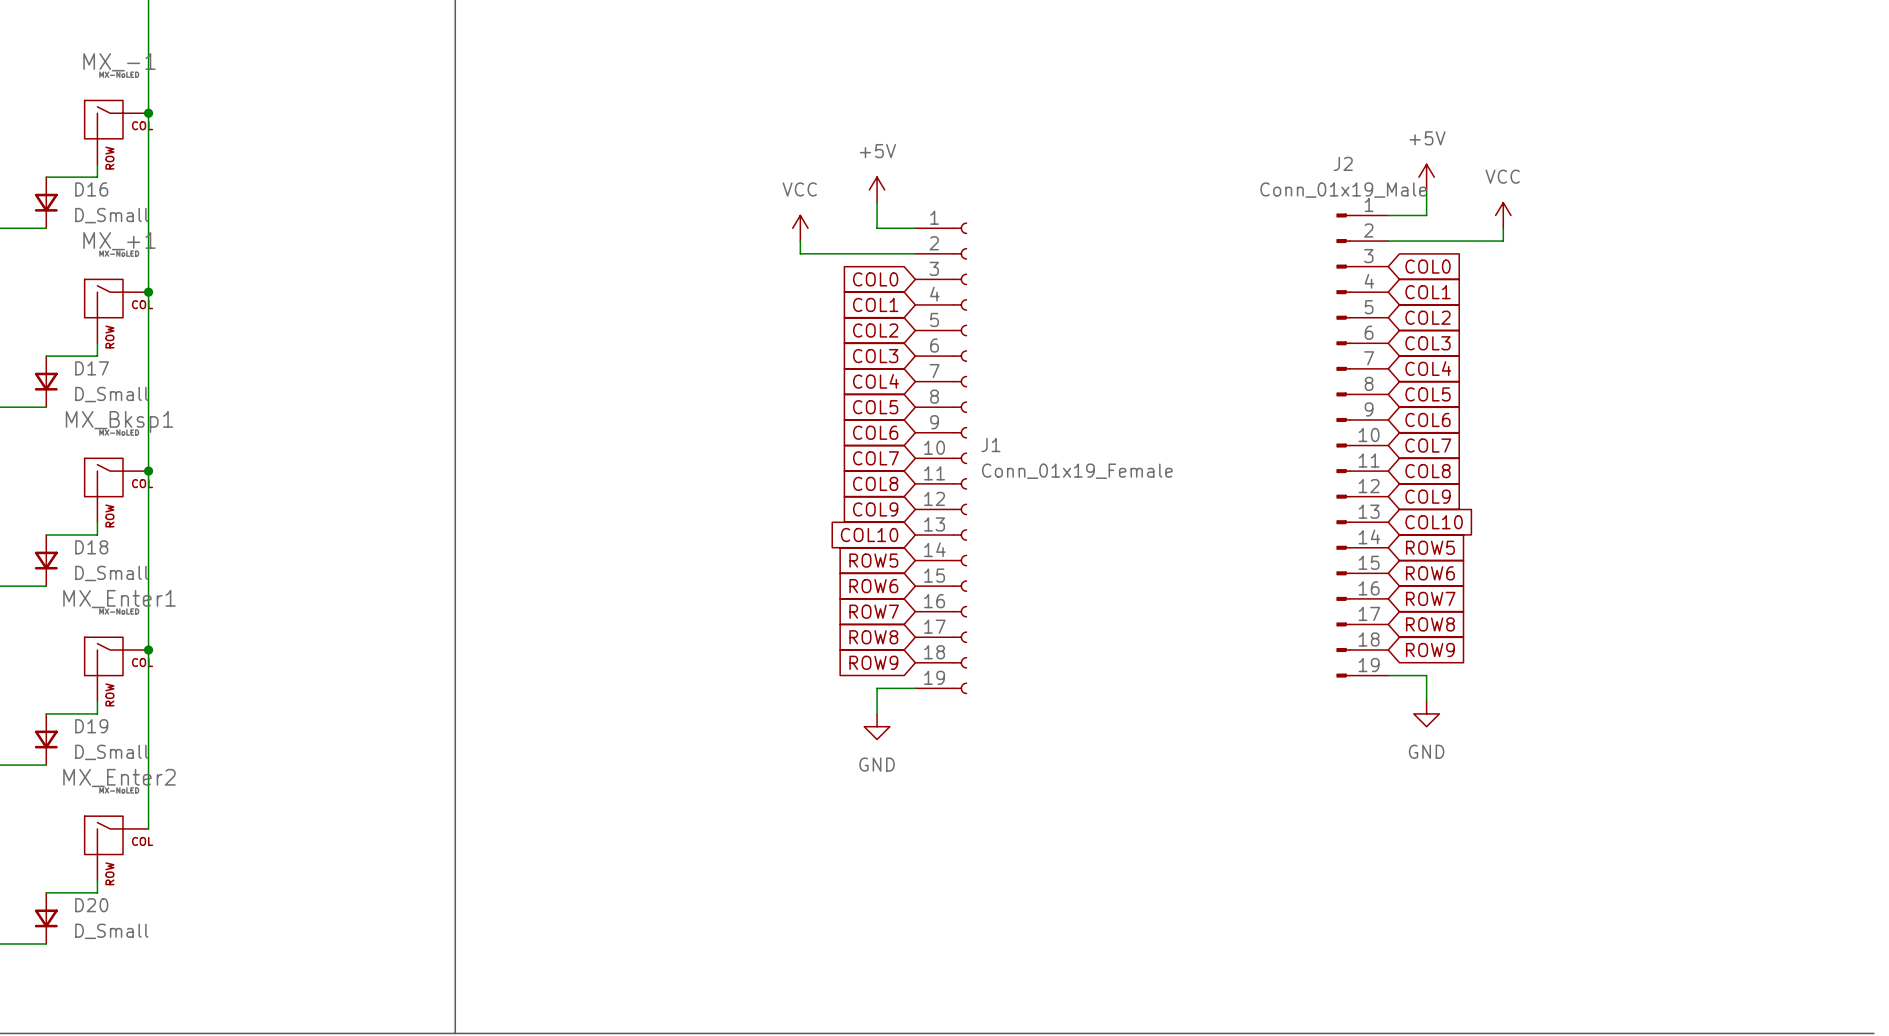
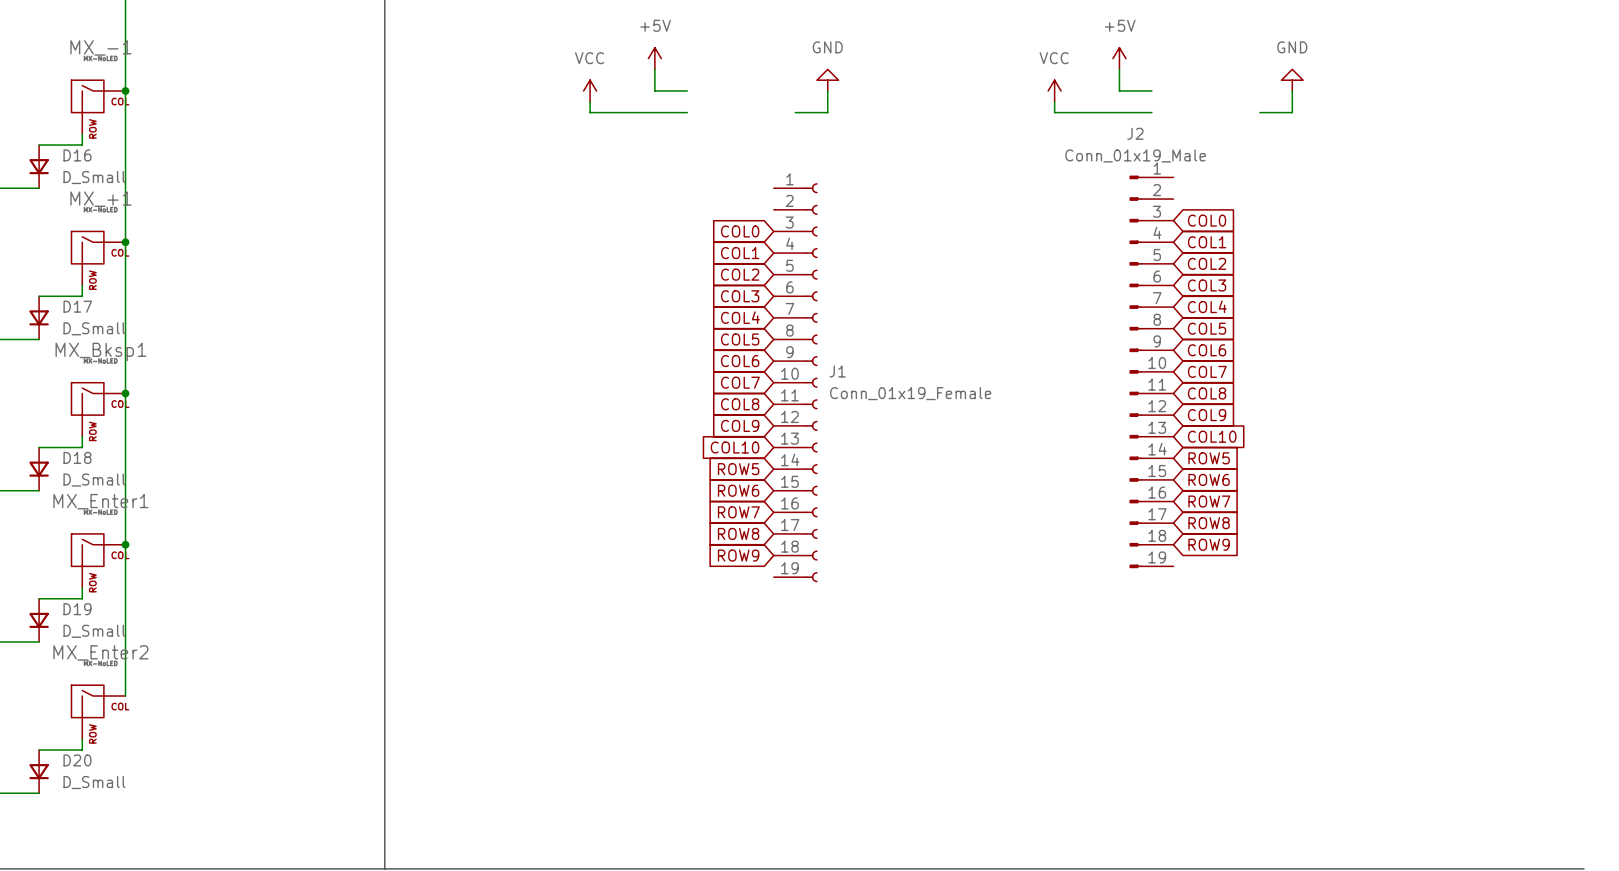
wire: none -> (1119, 69) (1119, 91) (1151, 91)
power symbol: none -> GND (827, 80)
power symbol: none -> GND (1292, 80)
wire: none -> (827, 91) (827, 112) (795, 112)
power symbol: none -> VCC (1054, 91)
wire: none -> (1054, 101) (1054, 112) (1151, 112)
power symbol position: +5V (1426, 177) -> +5V (1119, 58)
power symbol position: +5V (877, 189) -> +5V (654, 58)
wire: (1426, 189) (1426, 215) (1388, 215) -> (1292, 91) (1292, 112) (1259, 112)
wire: (877, 202) (877, 228) (915, 228) -> (654, 69) (654, 91) (687, 91)
power symbol: VCC (1503, 215) -> none
power symbol position: VCC (800, 228) -> VCC (590, 91)
wire: (1503, 228) (1503, 241) (1388, 241) -> none
wire: (800, 241) (800, 253) (915, 253) -> (590, 101) (590, 112) (687, 112)
wire: (1388, 675) (1426, 675) (1426, 701) -> none
wire: (915, 688) (877, 688) (877, 713) -> none
power symbol: GND (1426, 713) -> none
power symbol: GND (877, 726) -> none

